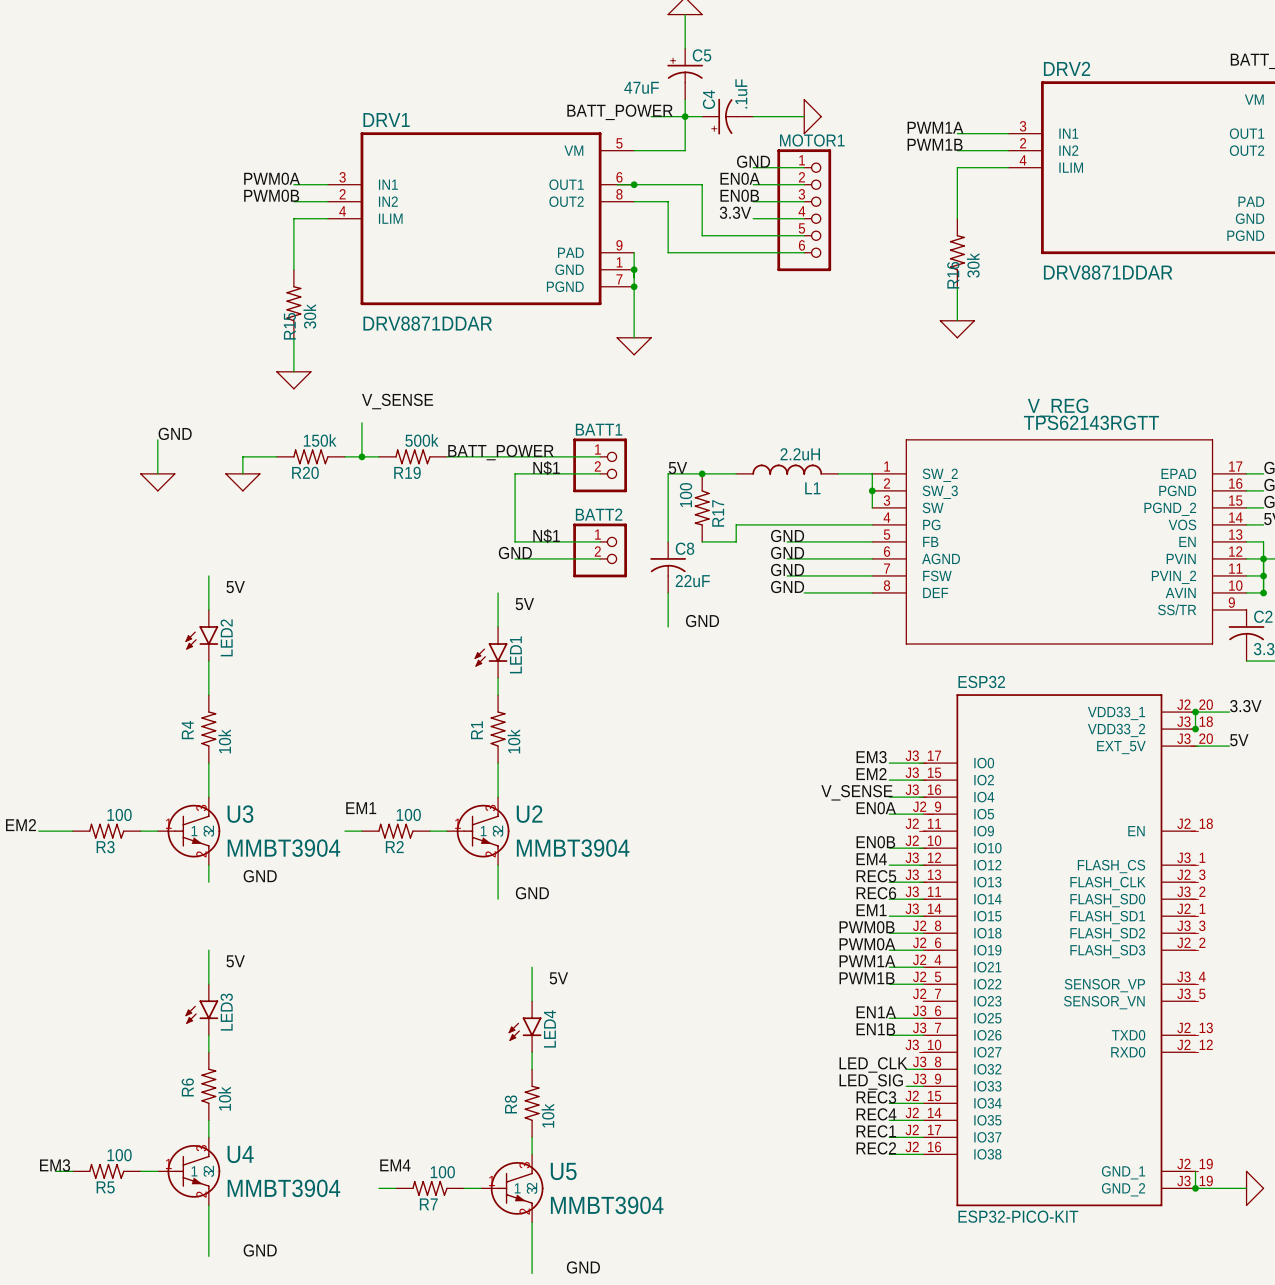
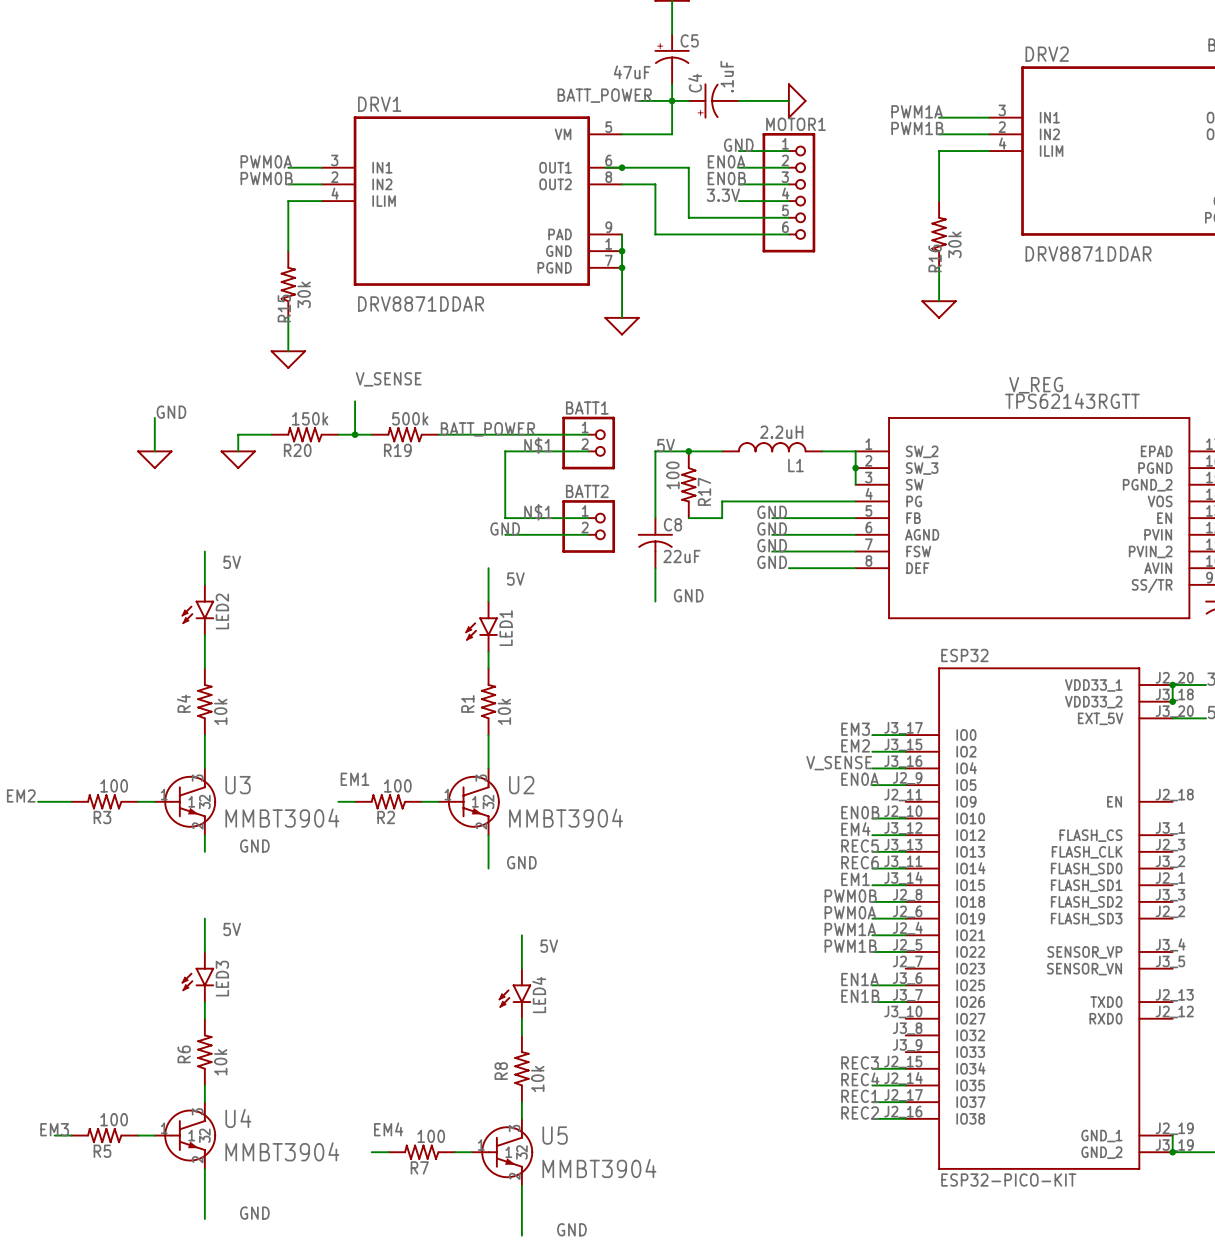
label: LED_CLK (873, 1064) -> none
wire: (906, 1069) (923, 1069) -> none
label: LED_SIG (871, 1081) -> none
wire: (906, 1086) (923, 1086) -> none

